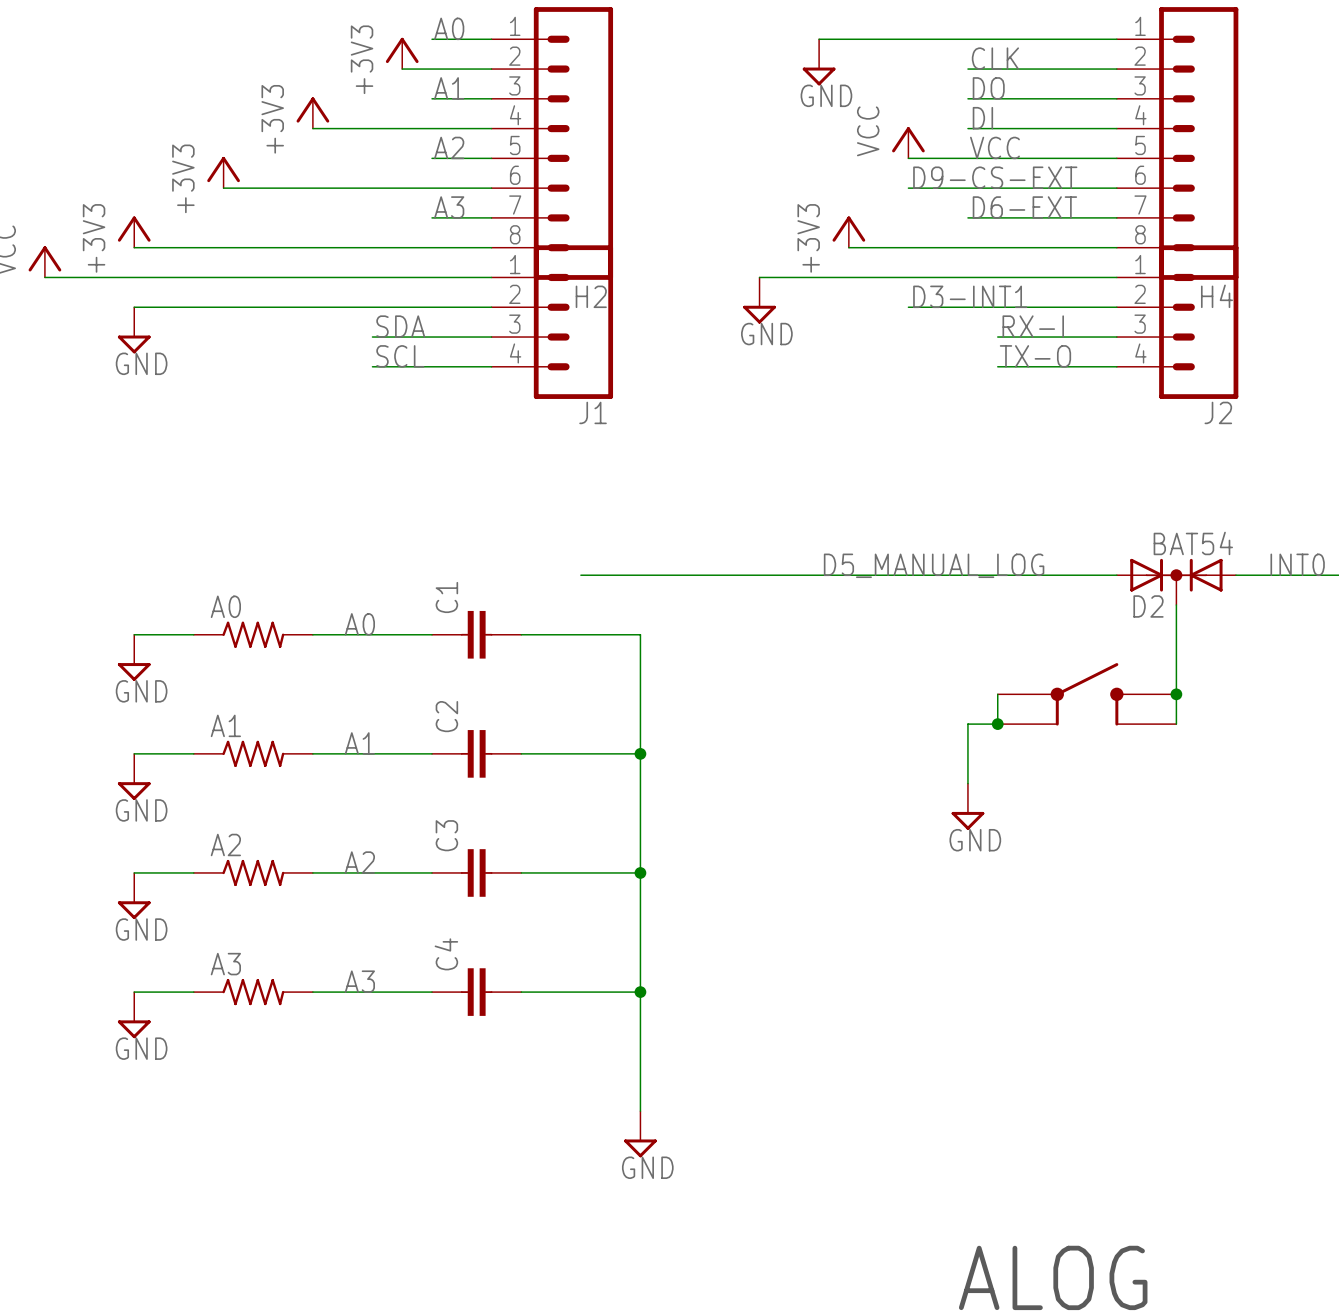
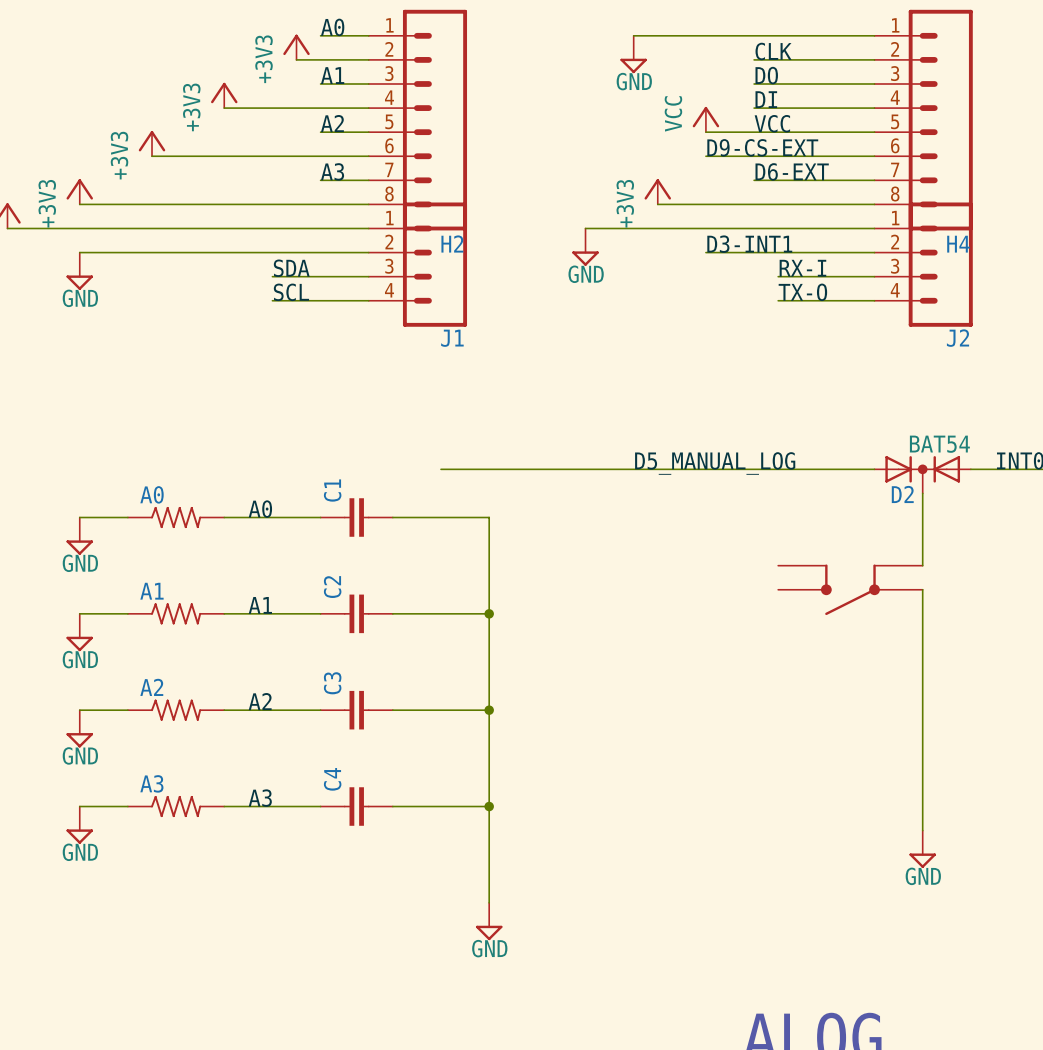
wire: (997, 694) (997, 724) (967, 724) (967, 783) -> none
part rotation: 0° (1087, 694) -> 180° (850, 589)
wire: (1176, 694) (1176, 724) -> (922, 830) (922, 589)
junction: (1176, 694) -> none
junction: (997, 724) -> none
power symbol: GND (967, 806) -> none
power symbol: none -> GND (922, 849)

